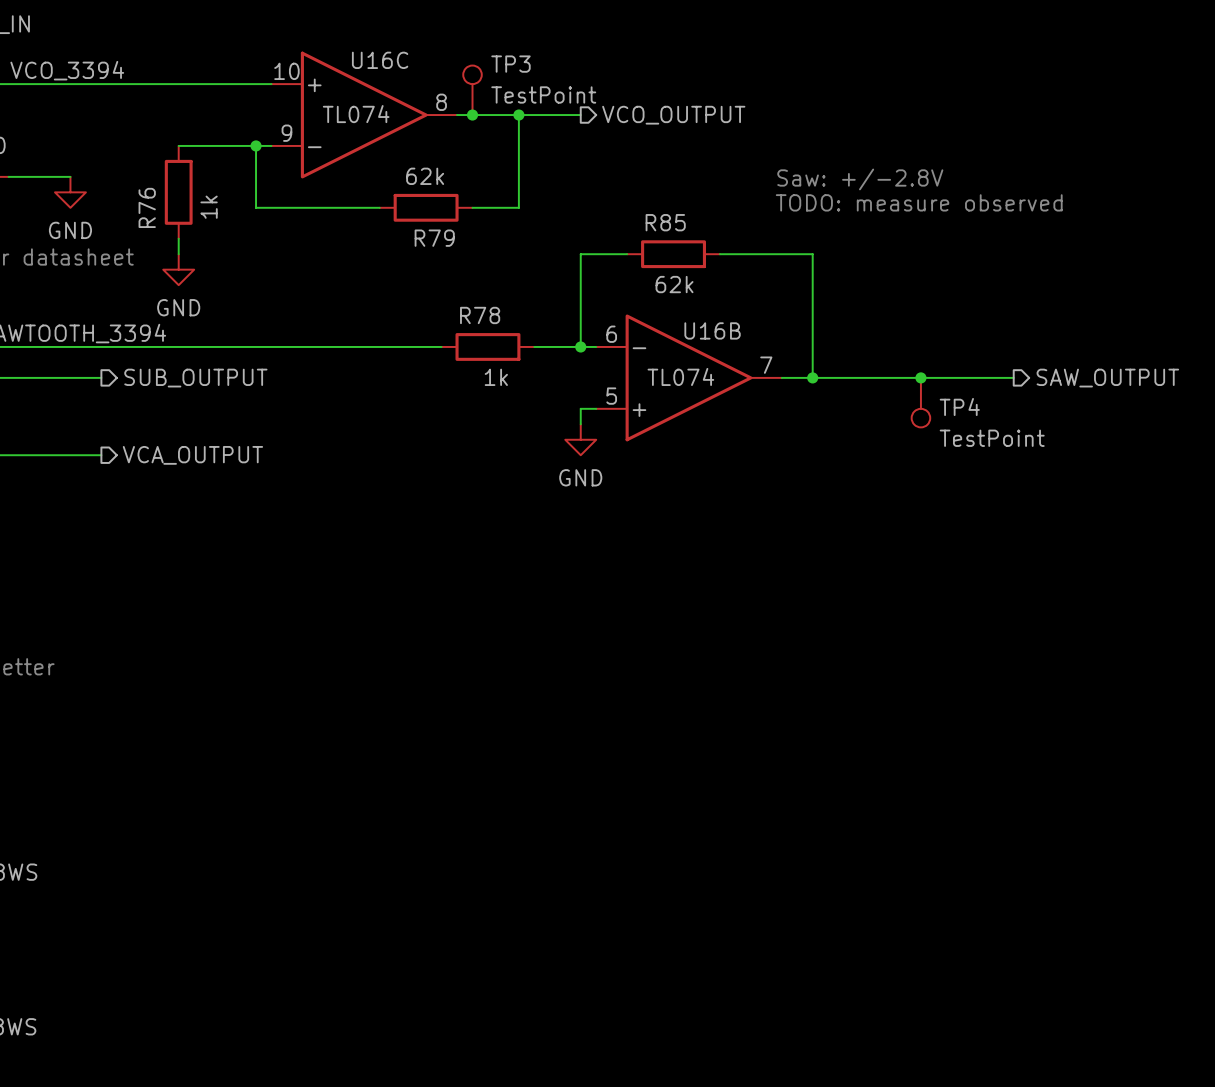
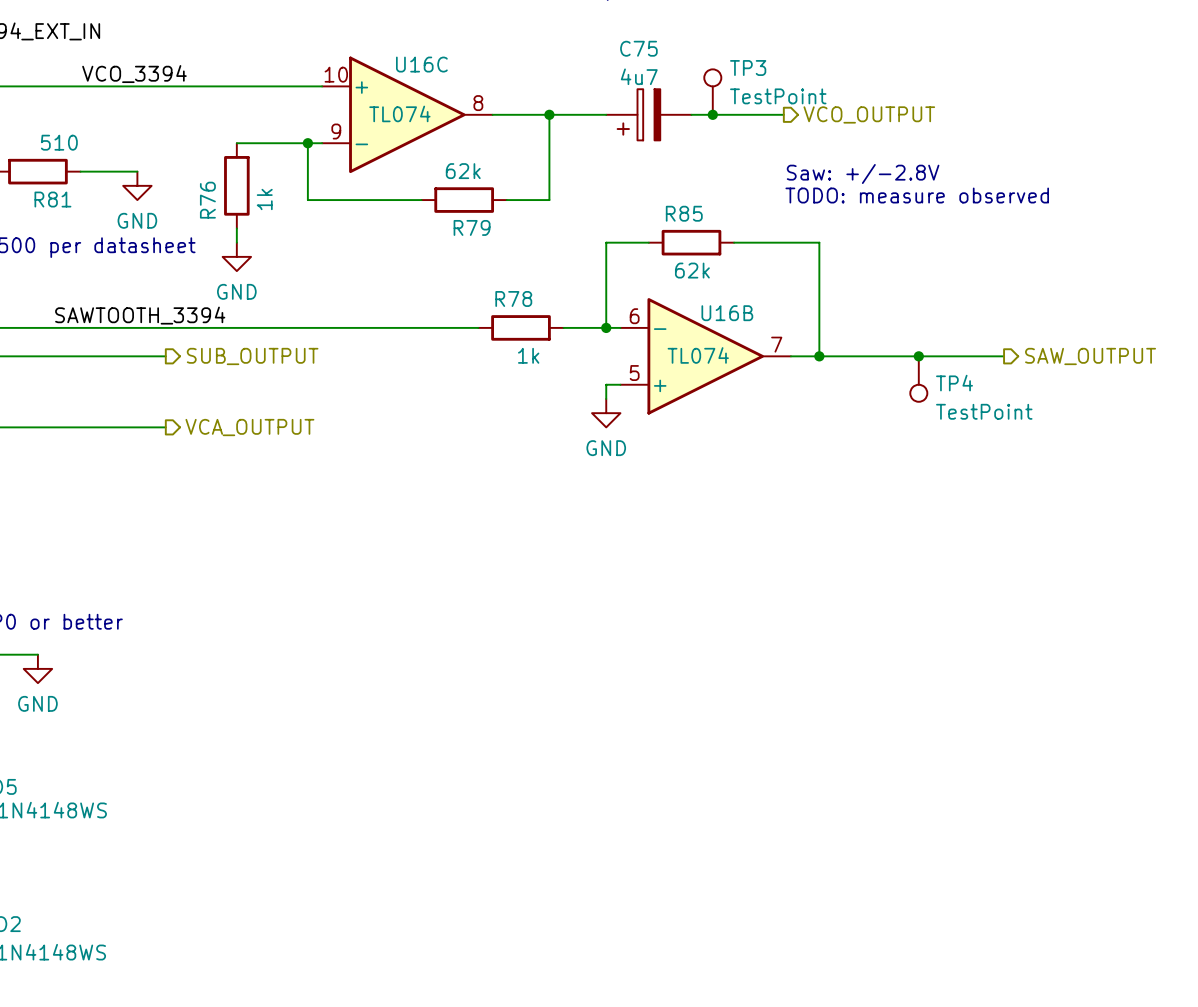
TP3 position: (472, 90) -> (712, 92)
junction: (472, 115) -> none
C75: none -> 4u7 (648, 114)
wire: none -> (691, 114) (783, 114)
hierarchical label position: VCO_OUTPUT (673, 115) -> VCO_OUTPUT (869, 114)
junction: none -> (712, 114)

